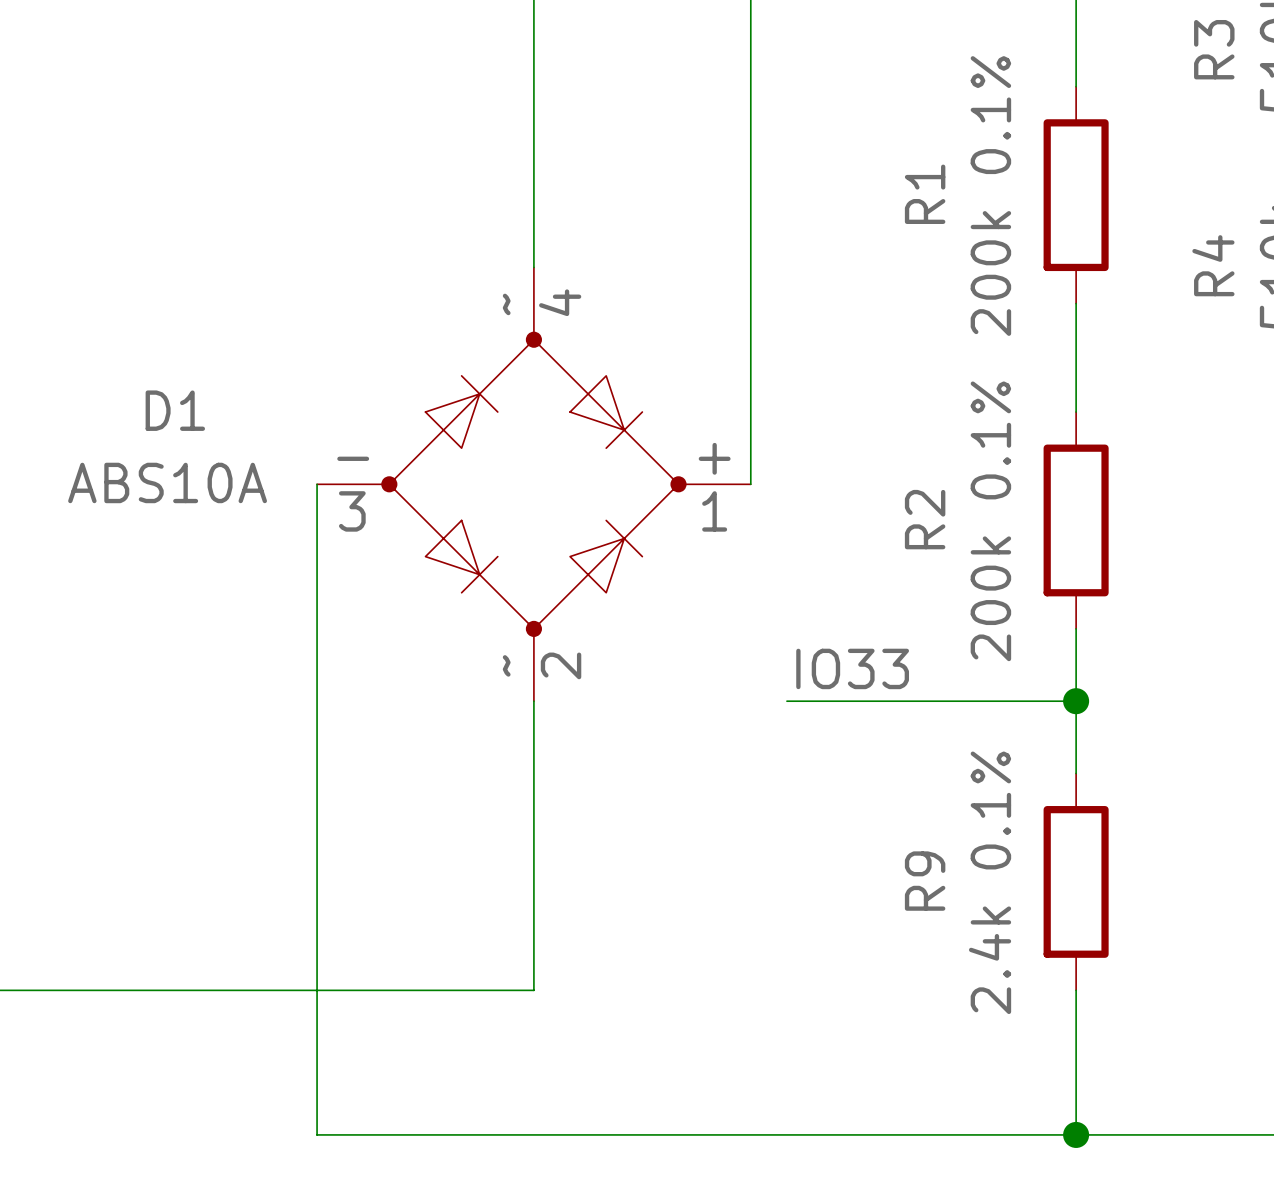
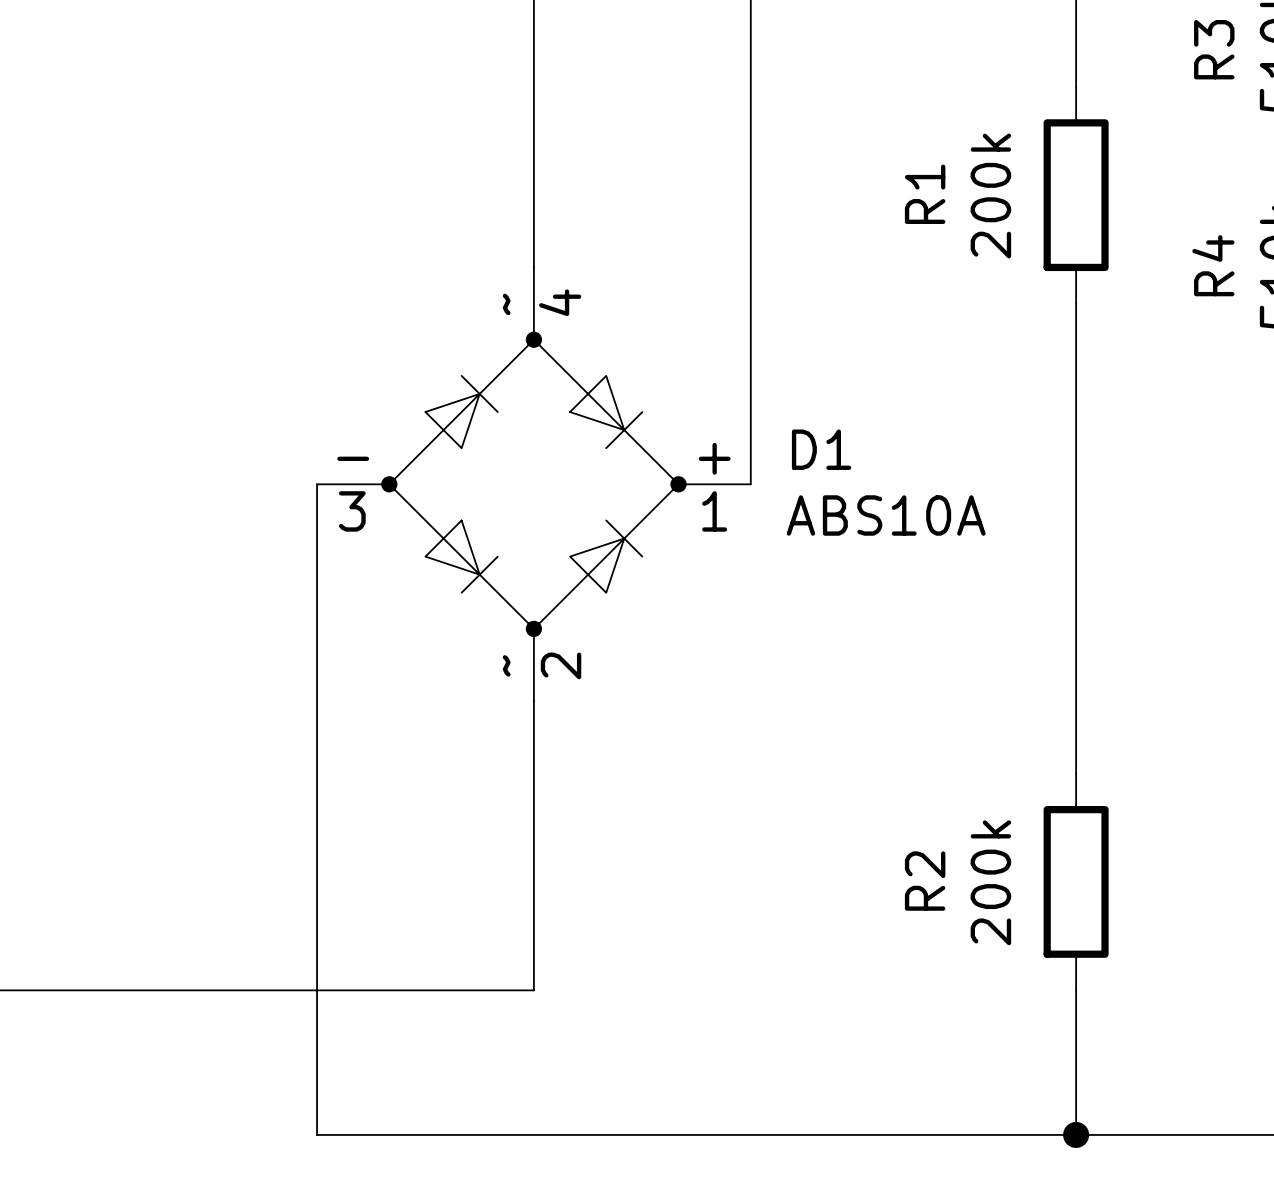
R1 value: 200k 0.1% (990, 196) -> 200k (990, 196)
D1 name position: D1 (175, 410) -> D1 (821, 449)
wire: none -> (1076, 412) (1076, 628)
D1 value position: ABS10A (167, 482) -> ABS10A (886, 515)
R2: 200k 0.1% (1076, 520) -> none
label: IO33 (852, 668) -> none
wire: (786, 701) (1076, 701) -> none
junction: (1076, 701) -> none
R9 name: R9 (925, 881) -> R2 (925, 881)
R9 value: 2.4k 0.1% (990, 882) -> 200k (990, 882)

